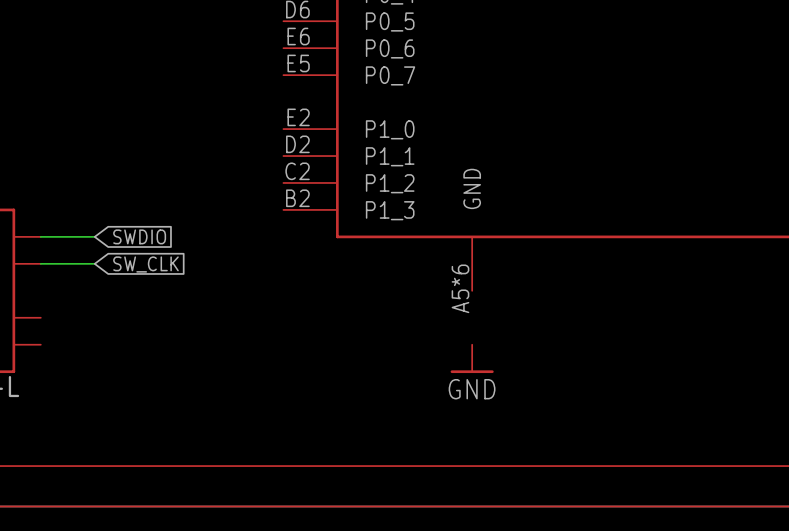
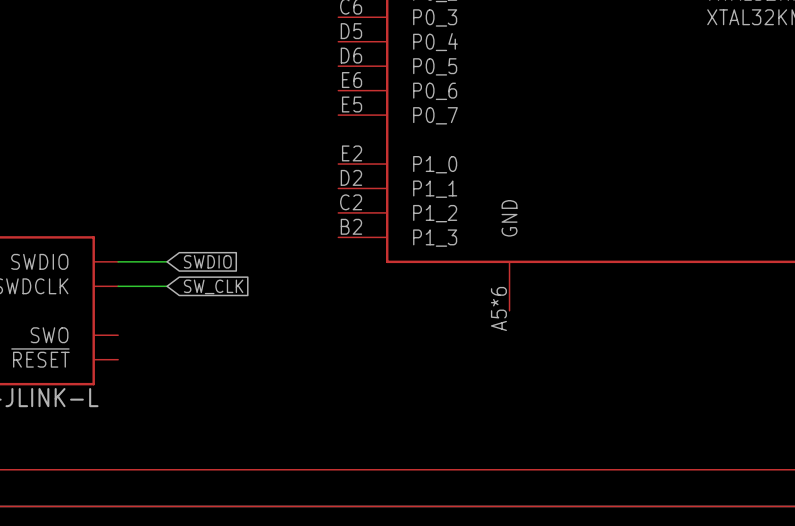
power symbol: GND (472, 358) -> none

